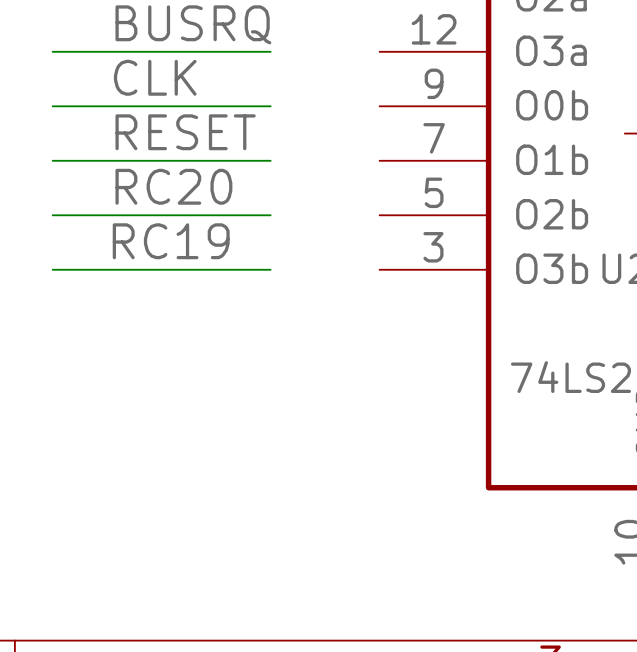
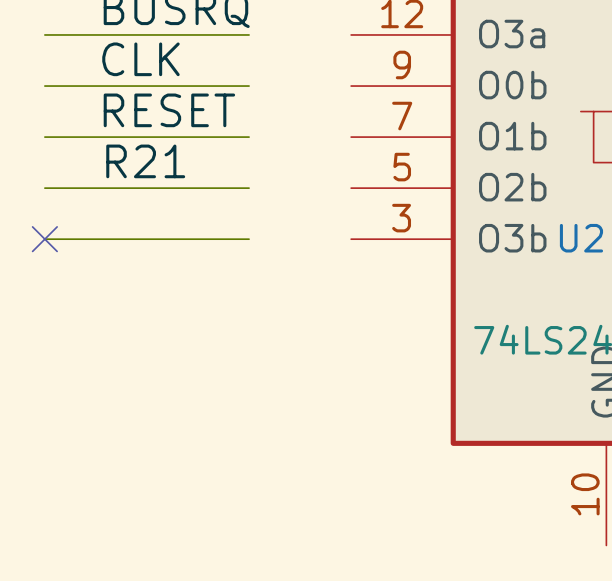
label: RC20 (173, 186) -> R21 (145, 161)
label: RC19 (171, 241) -> none
no-connect mark: none -> (44, 239)

